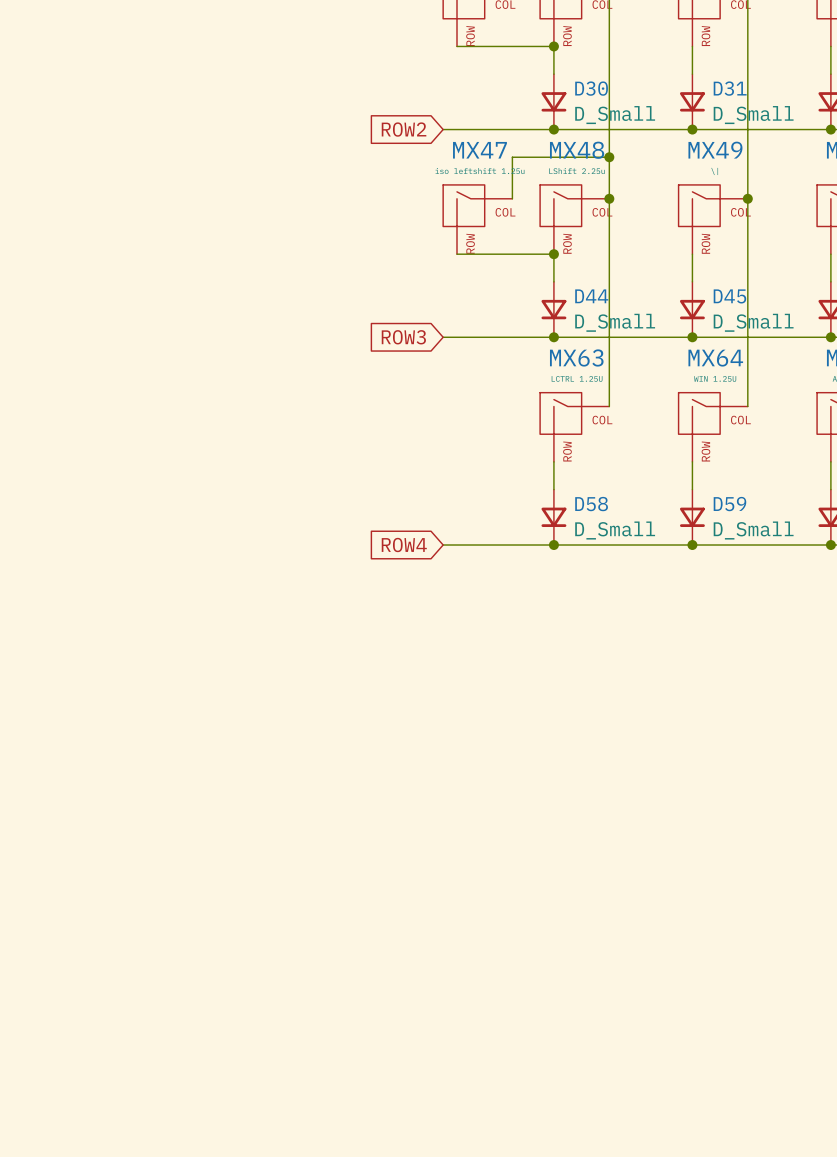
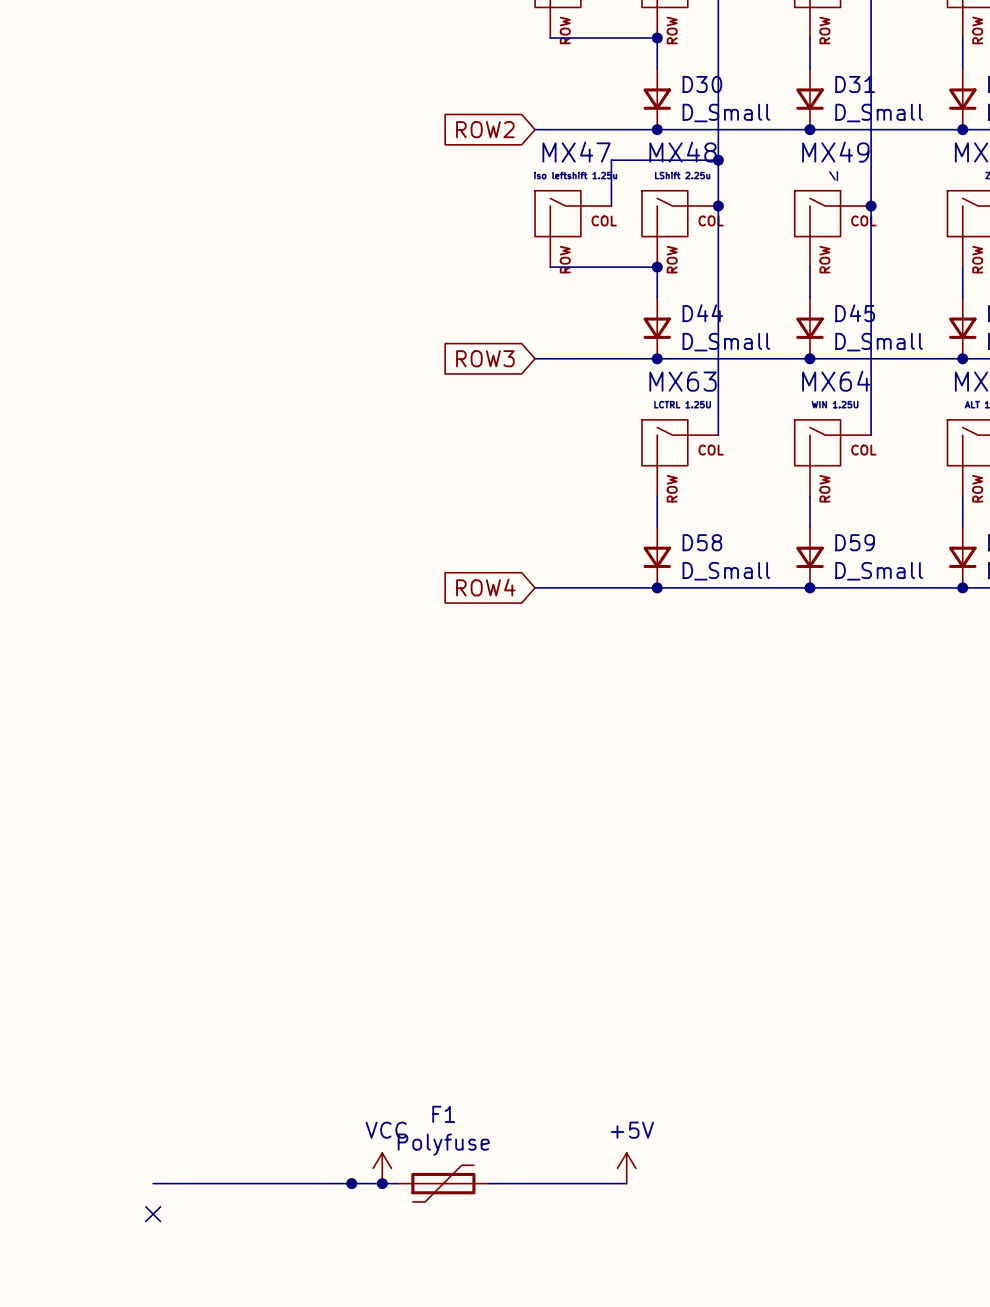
power symbol: none -> VCC (382, 1168)
power symbol: none -> +5V (626, 1168)
wire: none -> (153, 1183) (397, 1183)
junction: none -> (351, 1183)
junction: none -> (382, 1183)
F1: none -> Polyfuse (443, 1183)
wire: none -> (489, 1183) (626, 1183)
no-connect mark: none -> (153, 1214)

